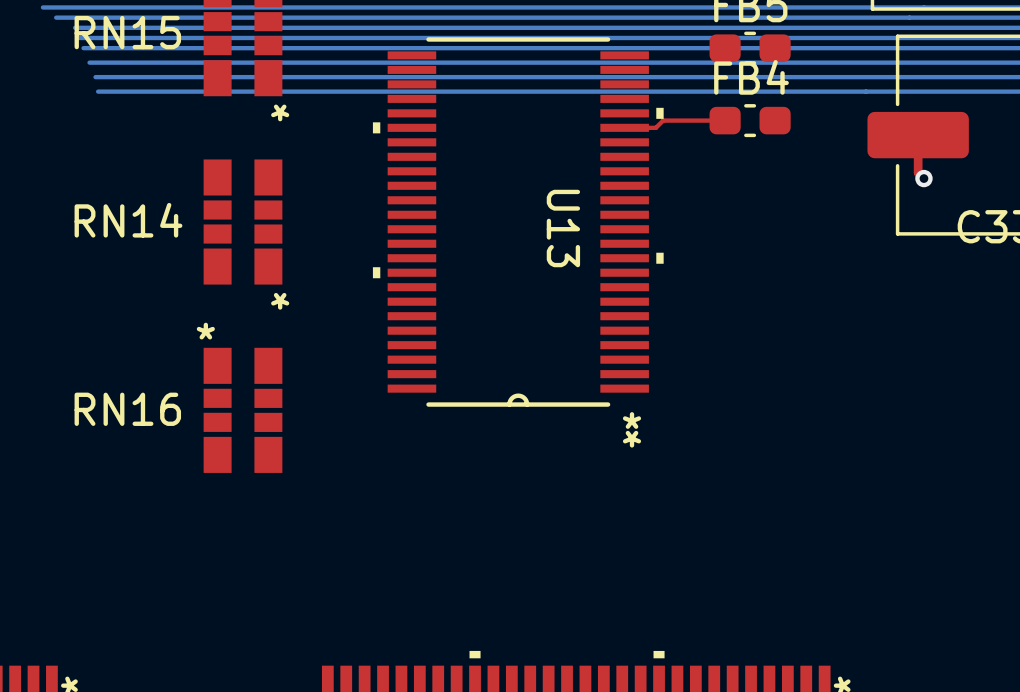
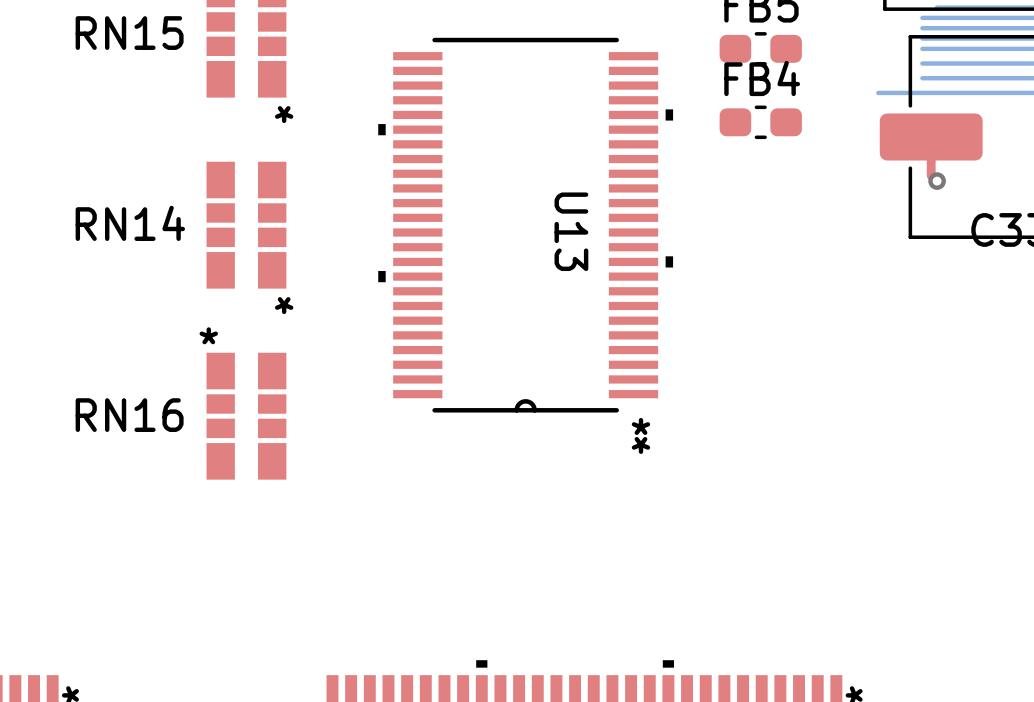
bottom track: (42, 7) (923, 7) -> none
bottom track: (56, 17) (909, 17) -> none
bottom track: (75, 27) (909, 27) -> none
bottom track: (79, 37) (909, 37) -> none
bottom track: (83, 48) (909, 48) -> none
bottom track: (89, 62) (909, 62) -> none
bottom track: (95, 77) (909, 77) -> none
bottom track: (98, 91) (866, 91) -> none
top track: (725, 120) (663, 120) (655, 127) (624, 127) -> none

